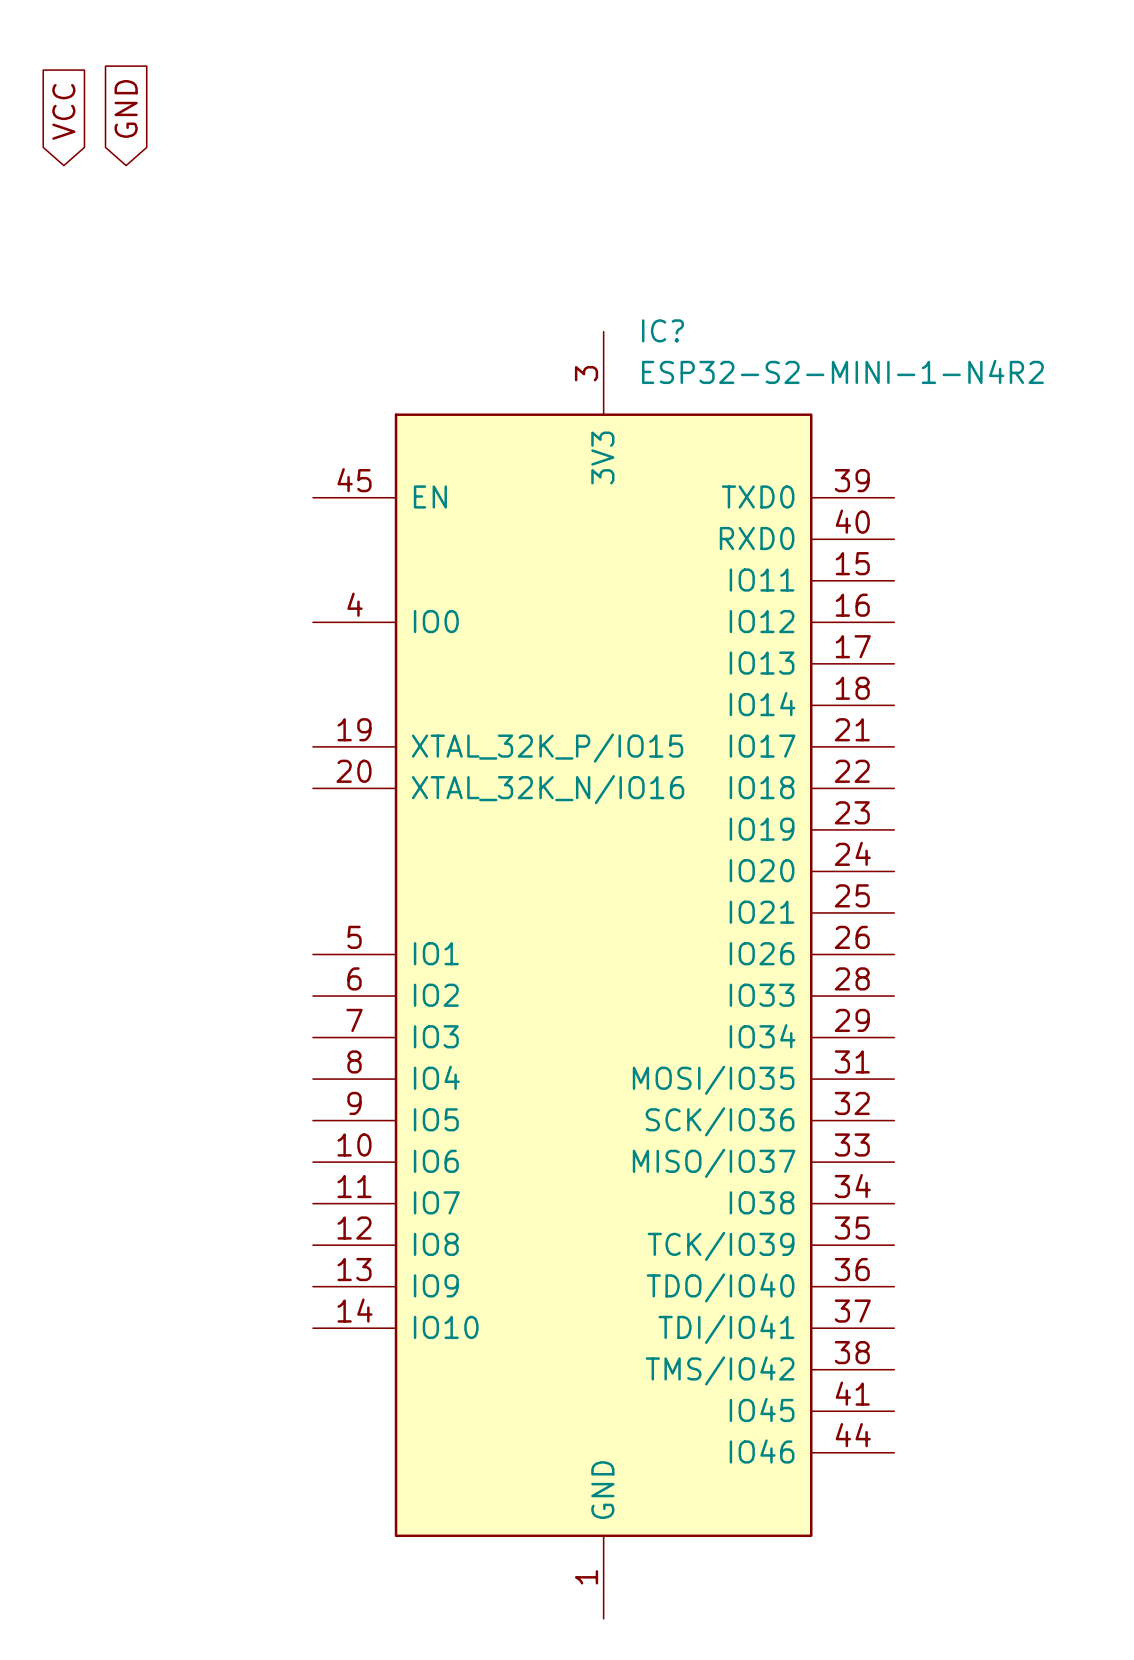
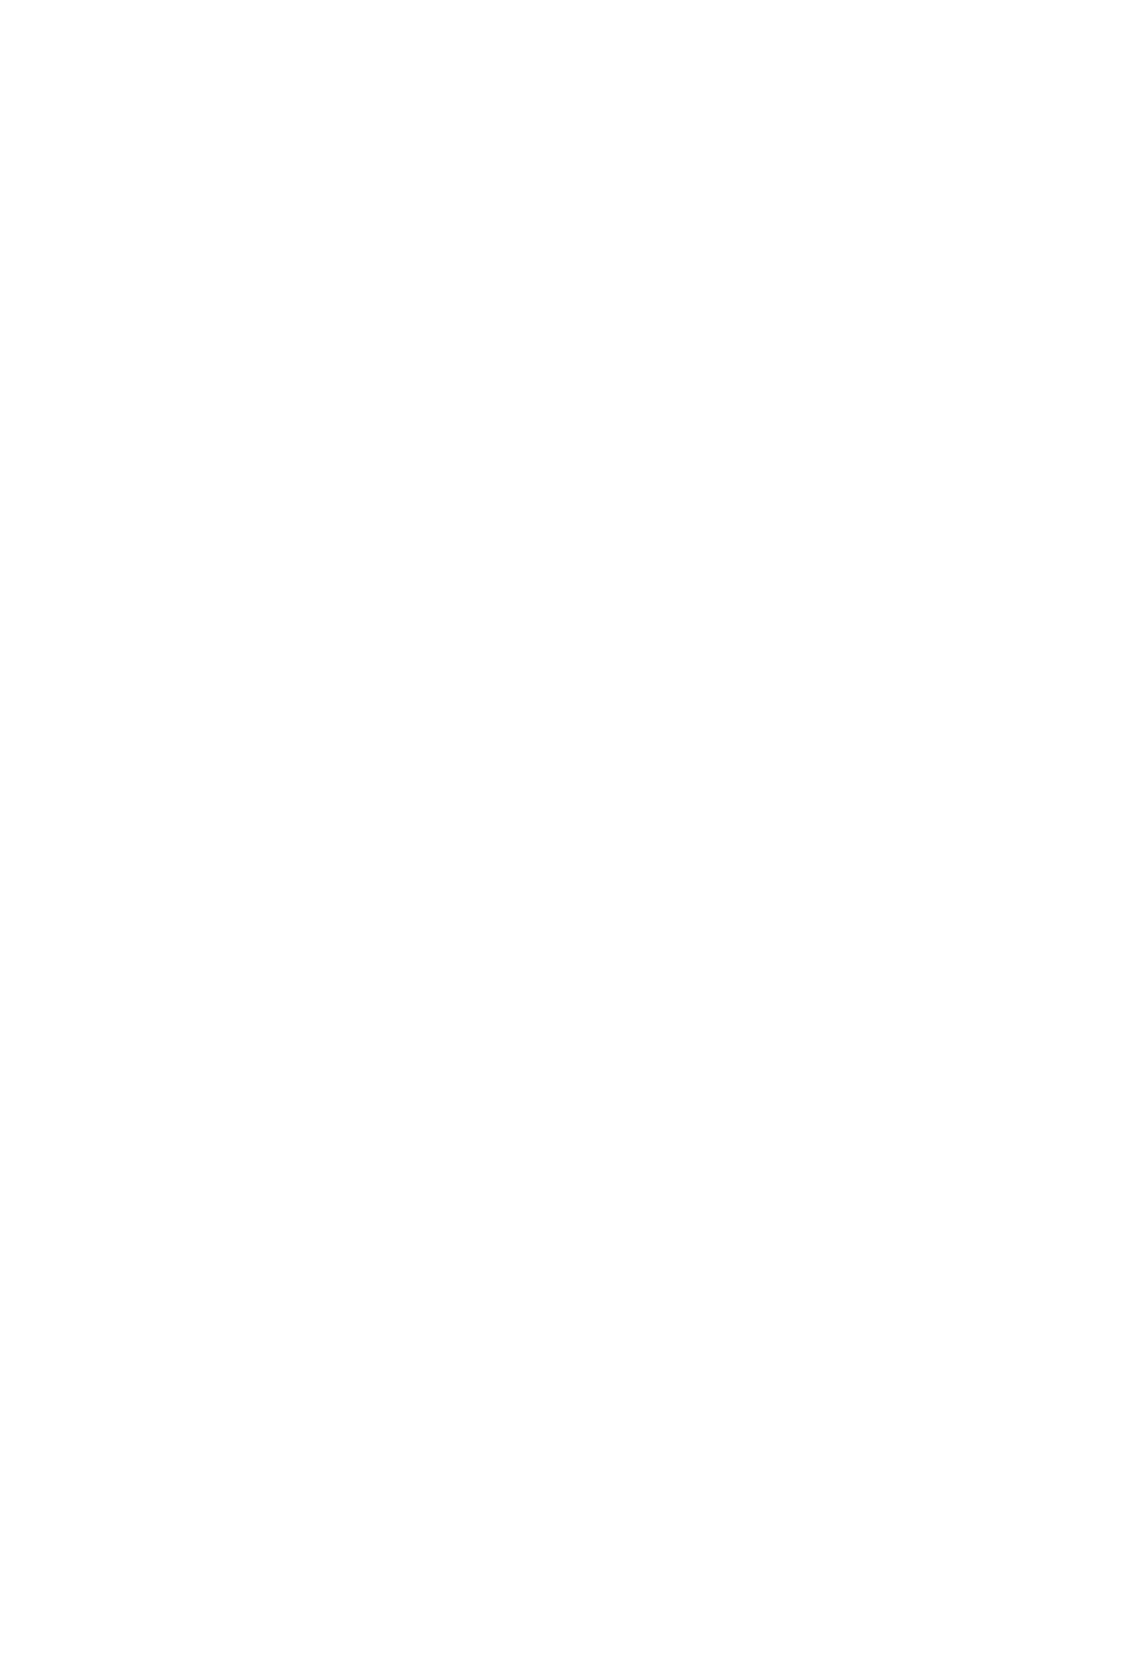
global label: GND (126, 108) -> none
global label: VCC (63, 111) -> none
IC?: ESP32-S2-MINI-1-N4R2 (603, 975) -> none

